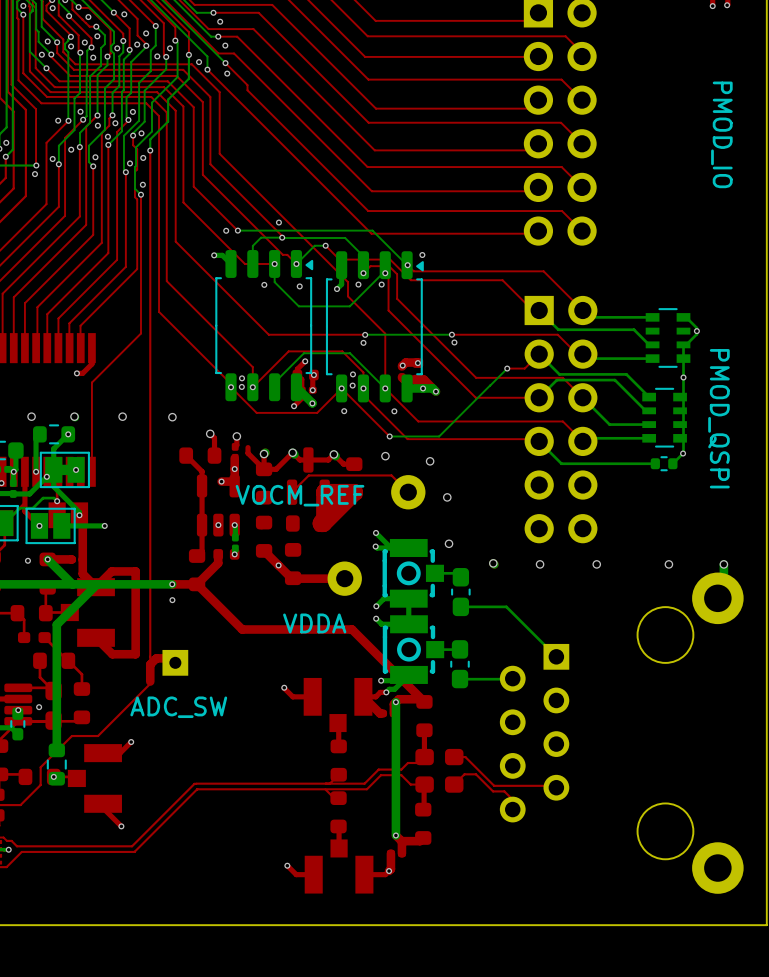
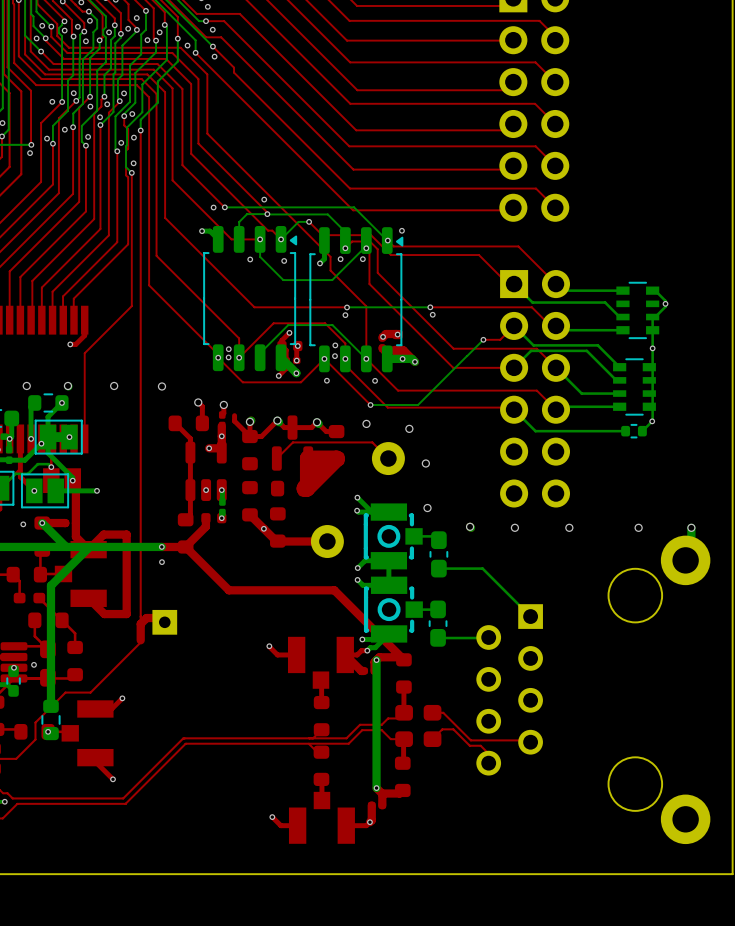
text: PMOD_IO (721, 134) -> none
text: PMOD_QSPI (718, 418) -> none
text: VOCM_REF (300, 495) -> none
text: VDDA (314, 623) -> none
text: ADC_SW (178, 707) -> none

